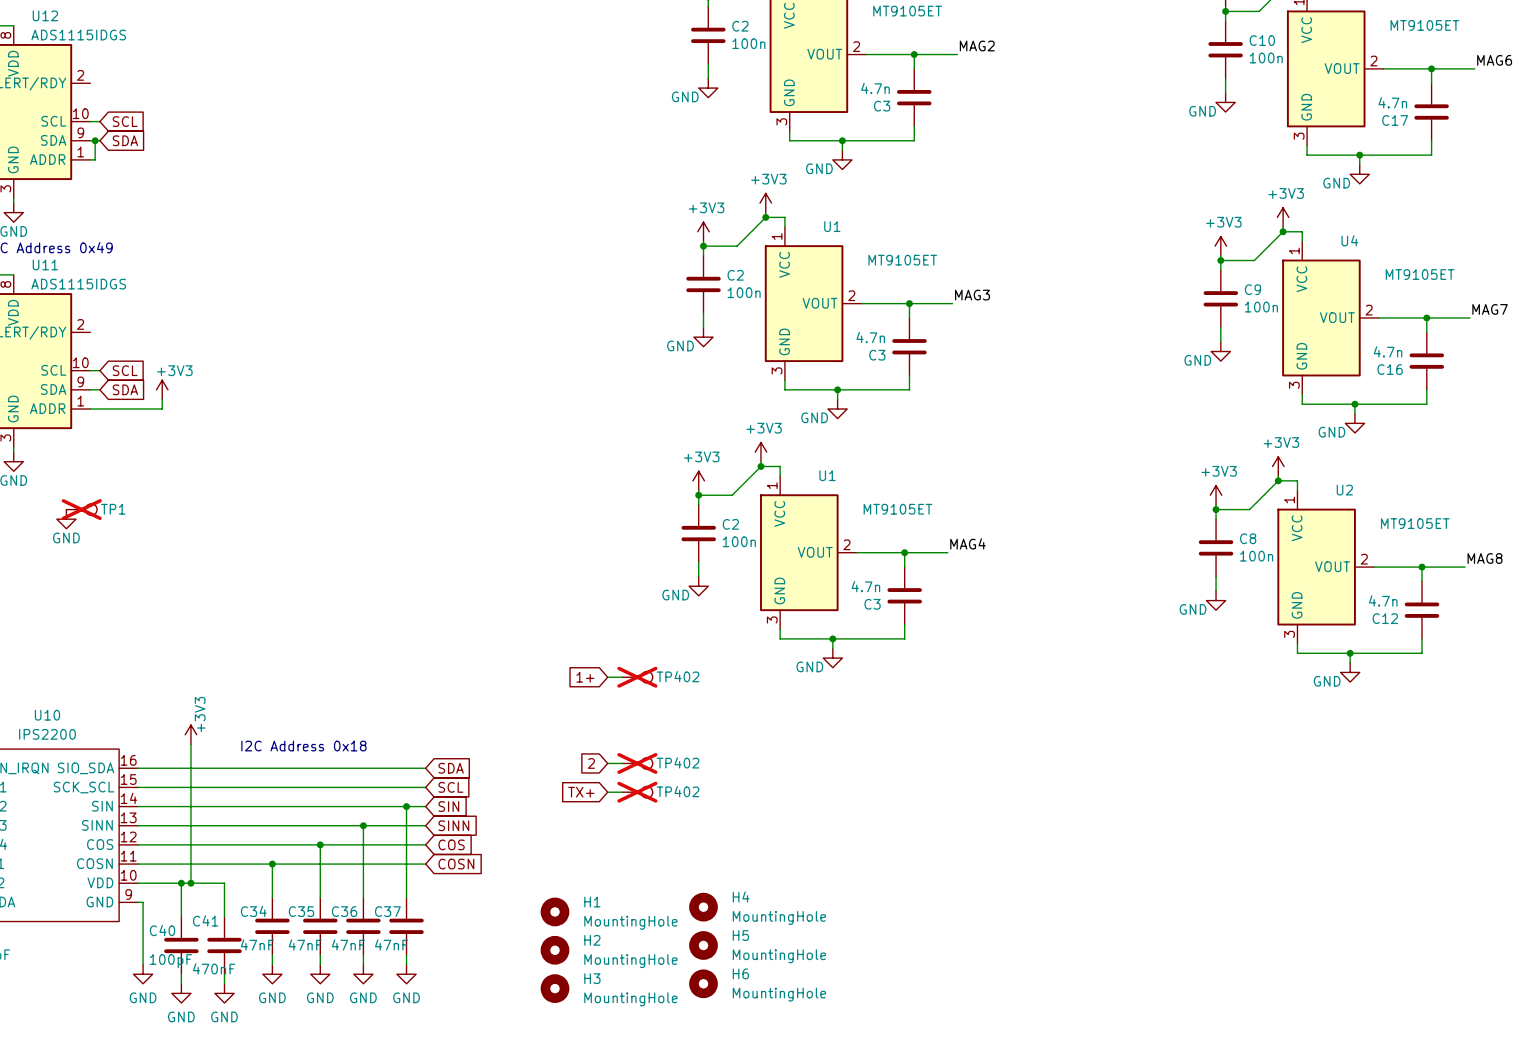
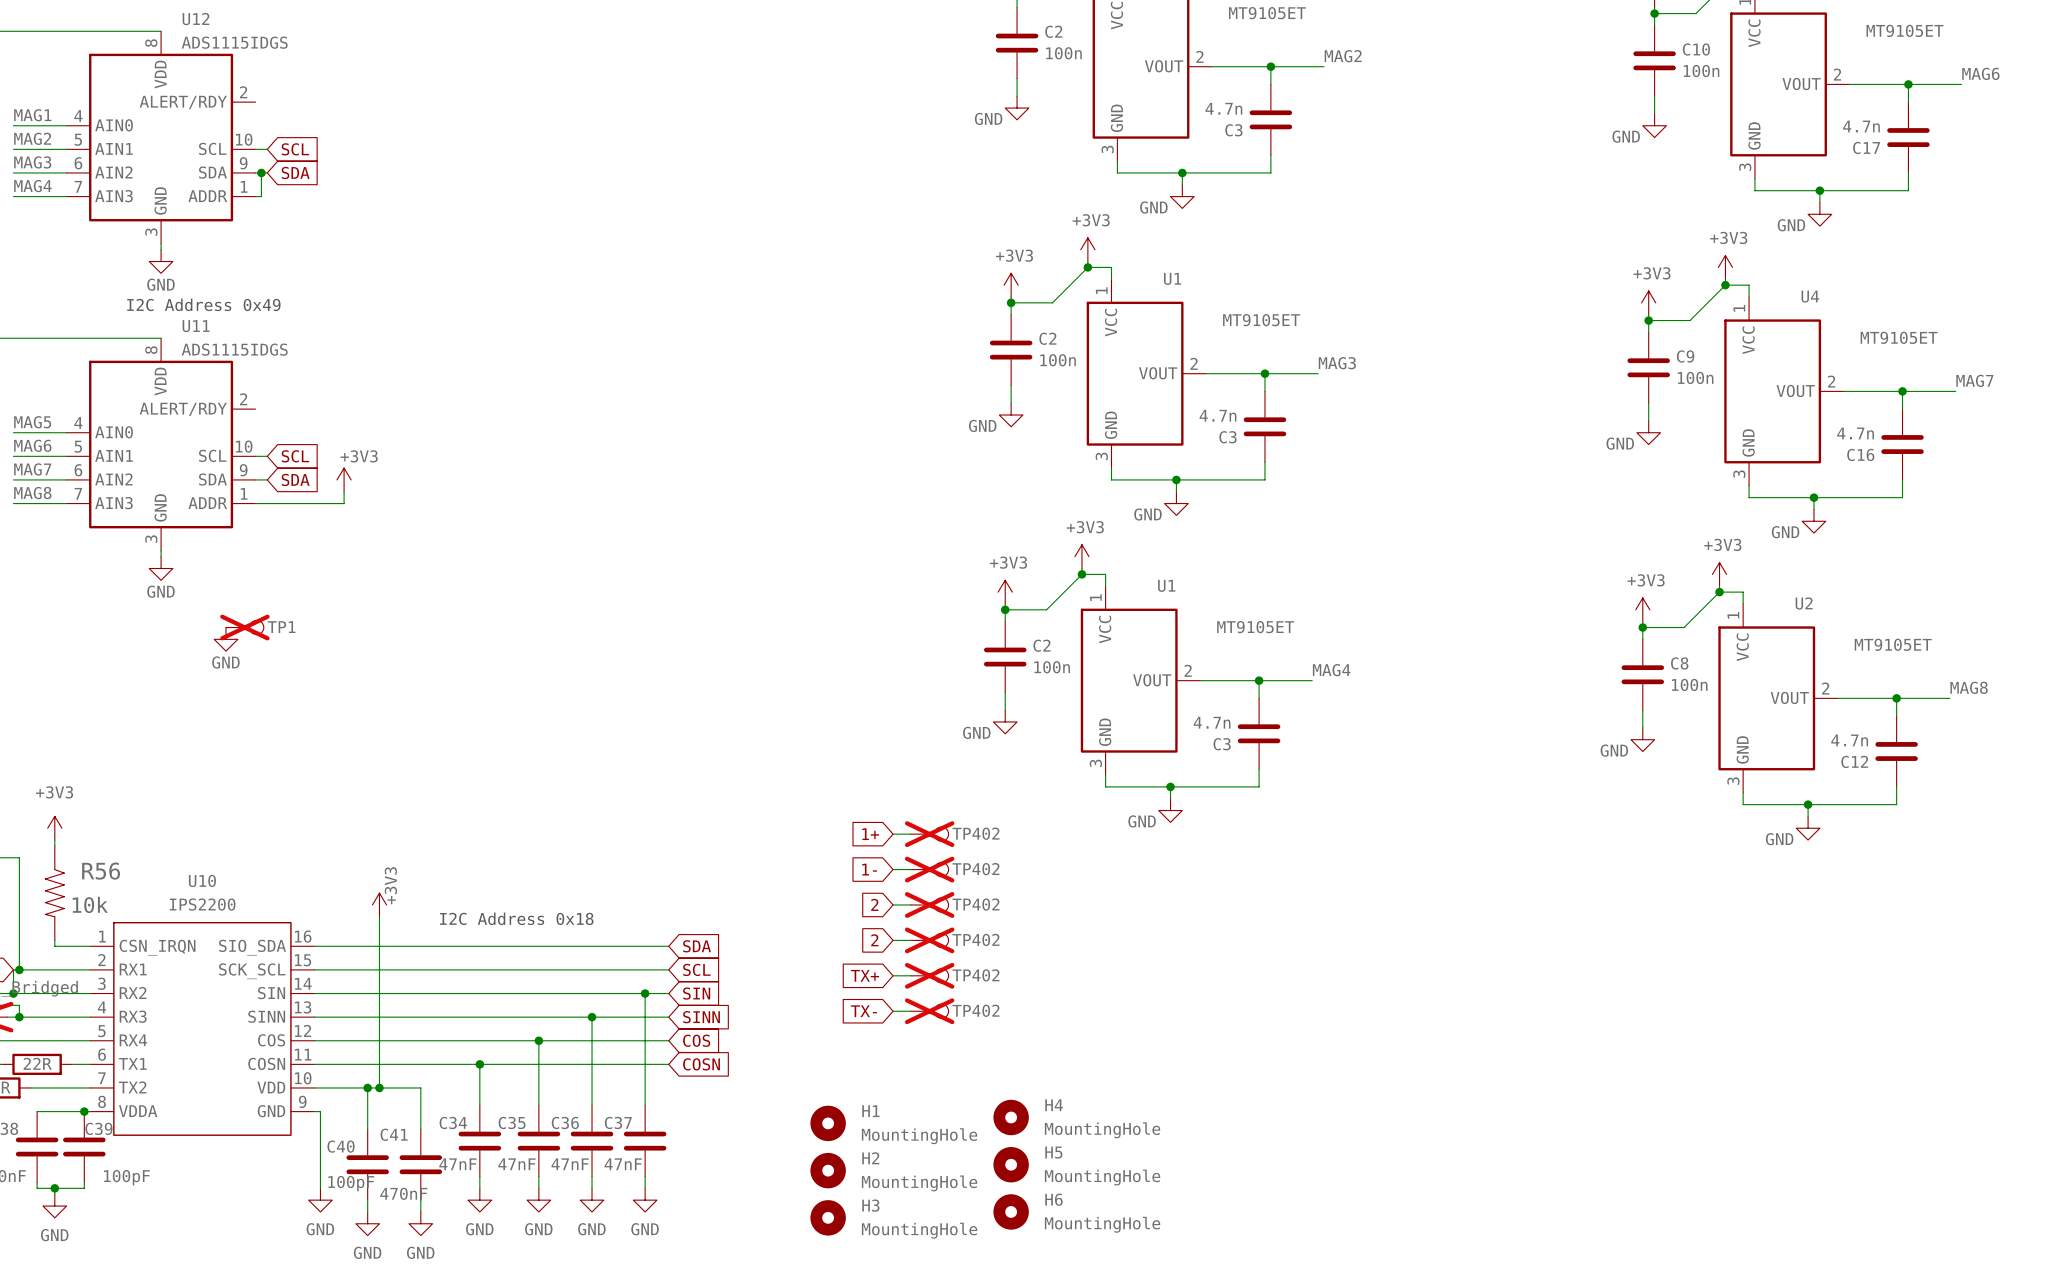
global label: none -> 1- (869, 869)
wire: none -> (893, 869) (910, 869)
TP402: none -> (929, 869)
global label: none -> 2 (874, 904)
wire: none -> (893, 904) (910, 904)
TP402: none -> (929, 904)
global label: none -> TX- (863, 1011)
wire: none -> (893, 1011) (910, 1011)
TP402: none -> (929, 1011)

